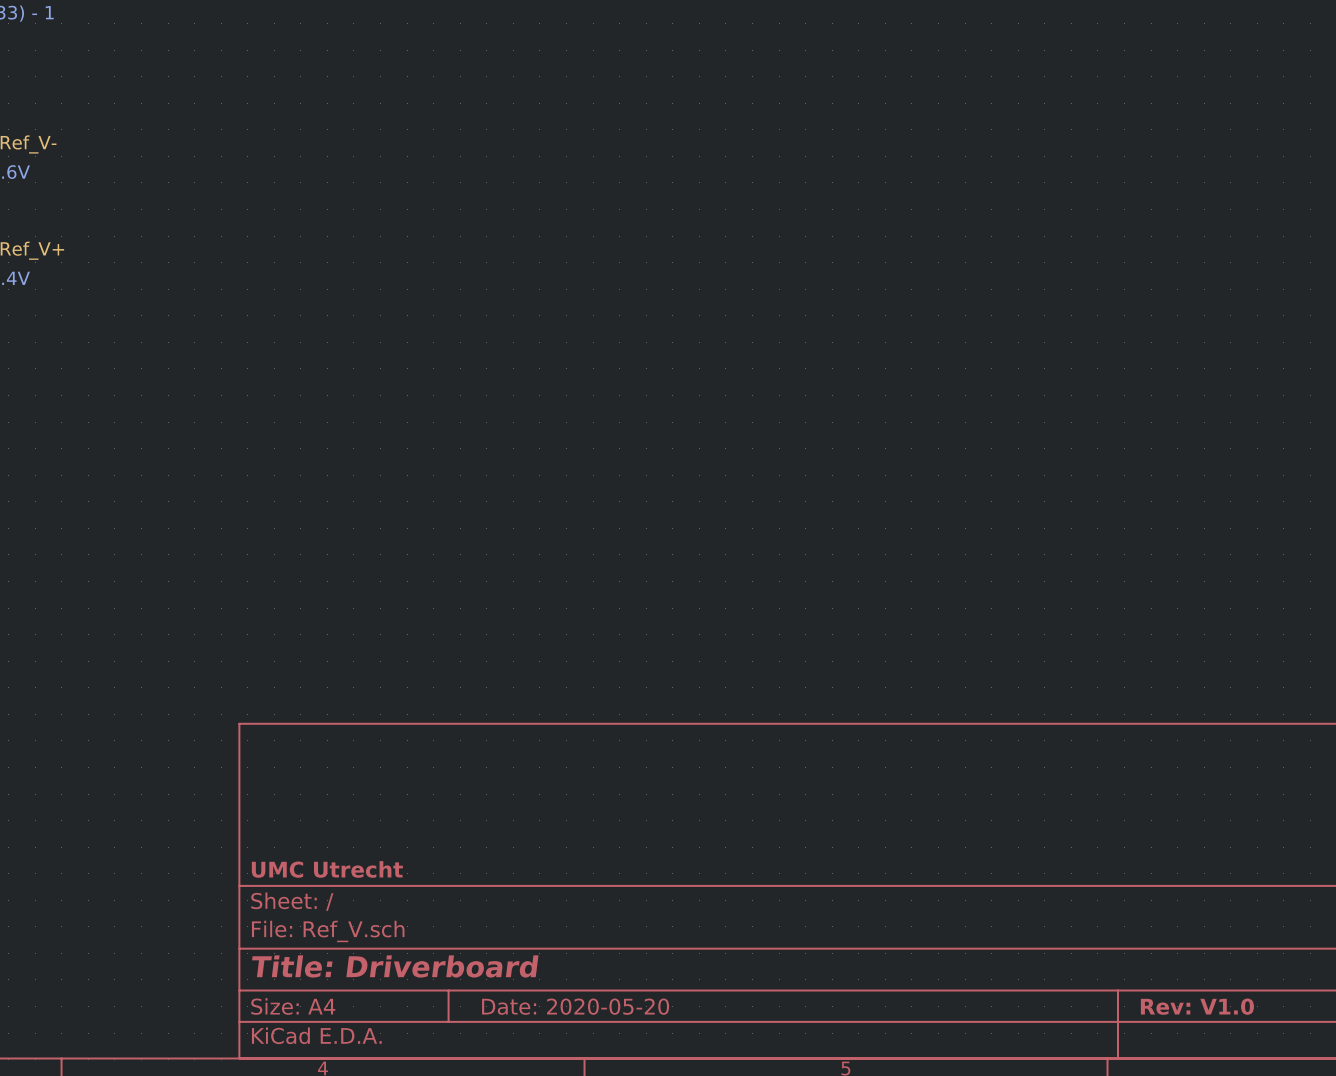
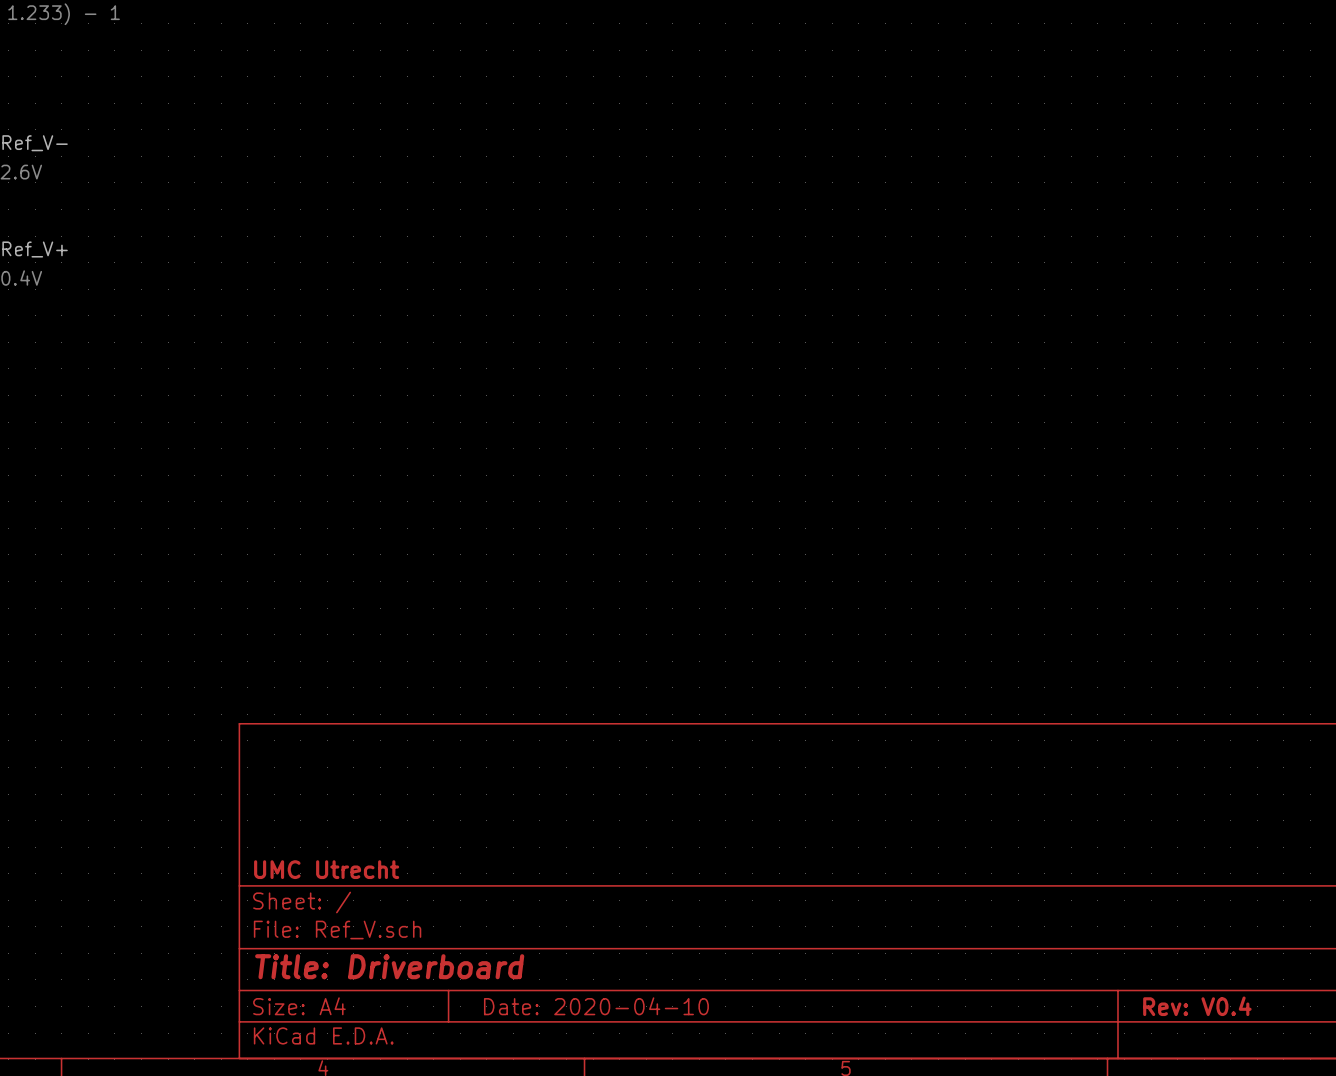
title block: Date: 2020-05-20 (575, 1006) -> Date: 2020-04-10 (596, 1006)
title block: Rev: V1.0 (1197, 1006) -> Rev: V0.4 (1197, 1006)

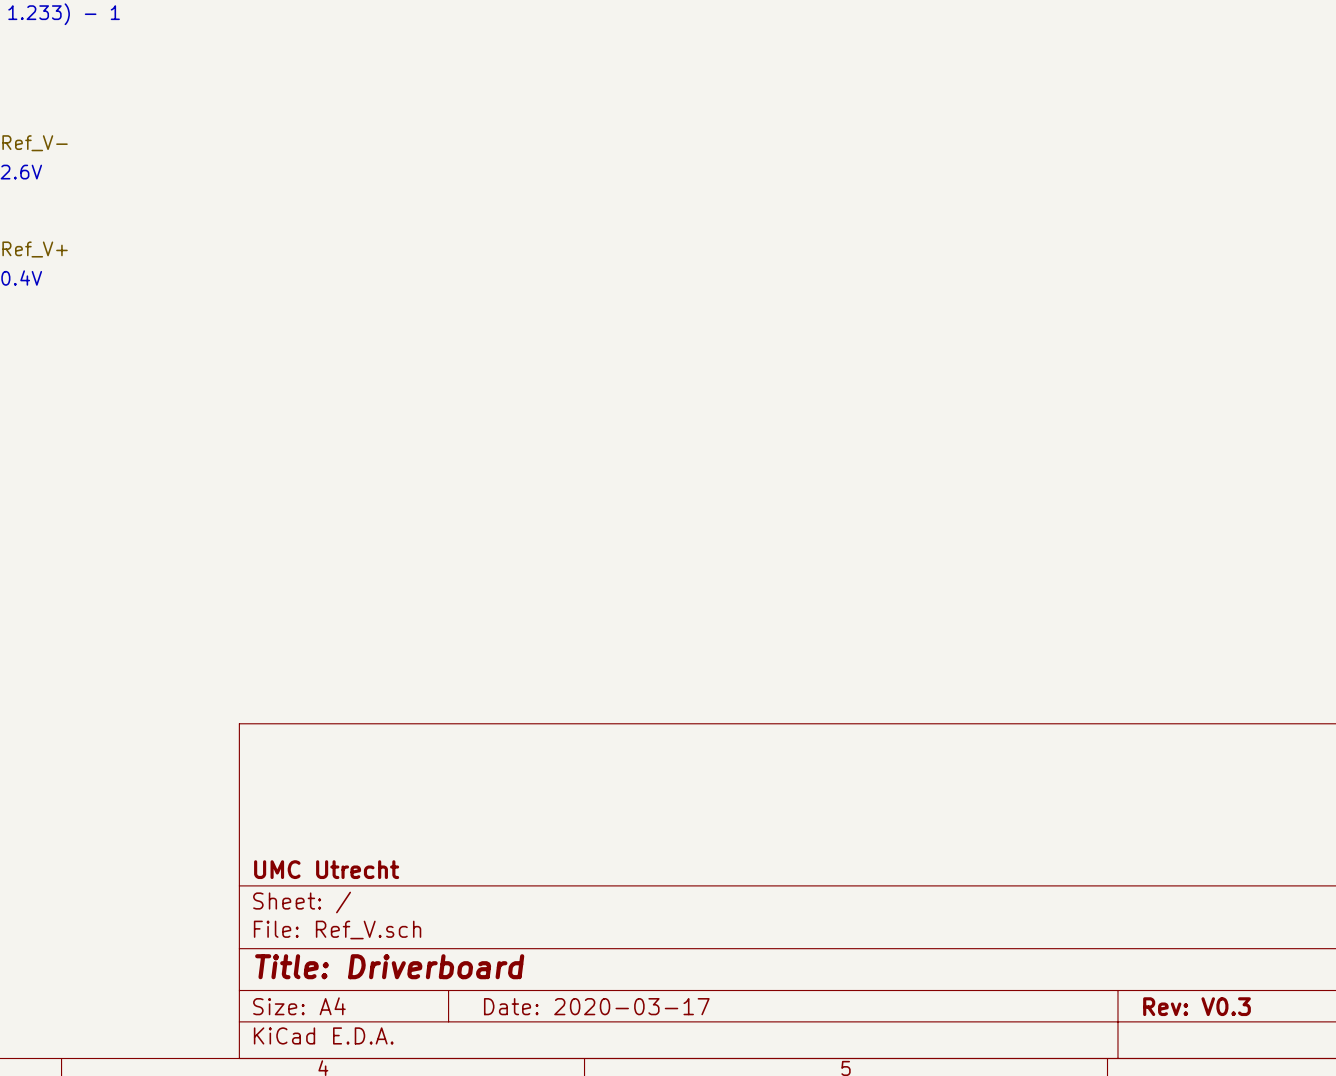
title block: Date: 2020-04-10 (596, 1006) -> Date: 2020-03-17 (596, 1006)
title block: Rev: V0.4 (1197, 1006) -> Rev: V0.3 (1197, 1006)

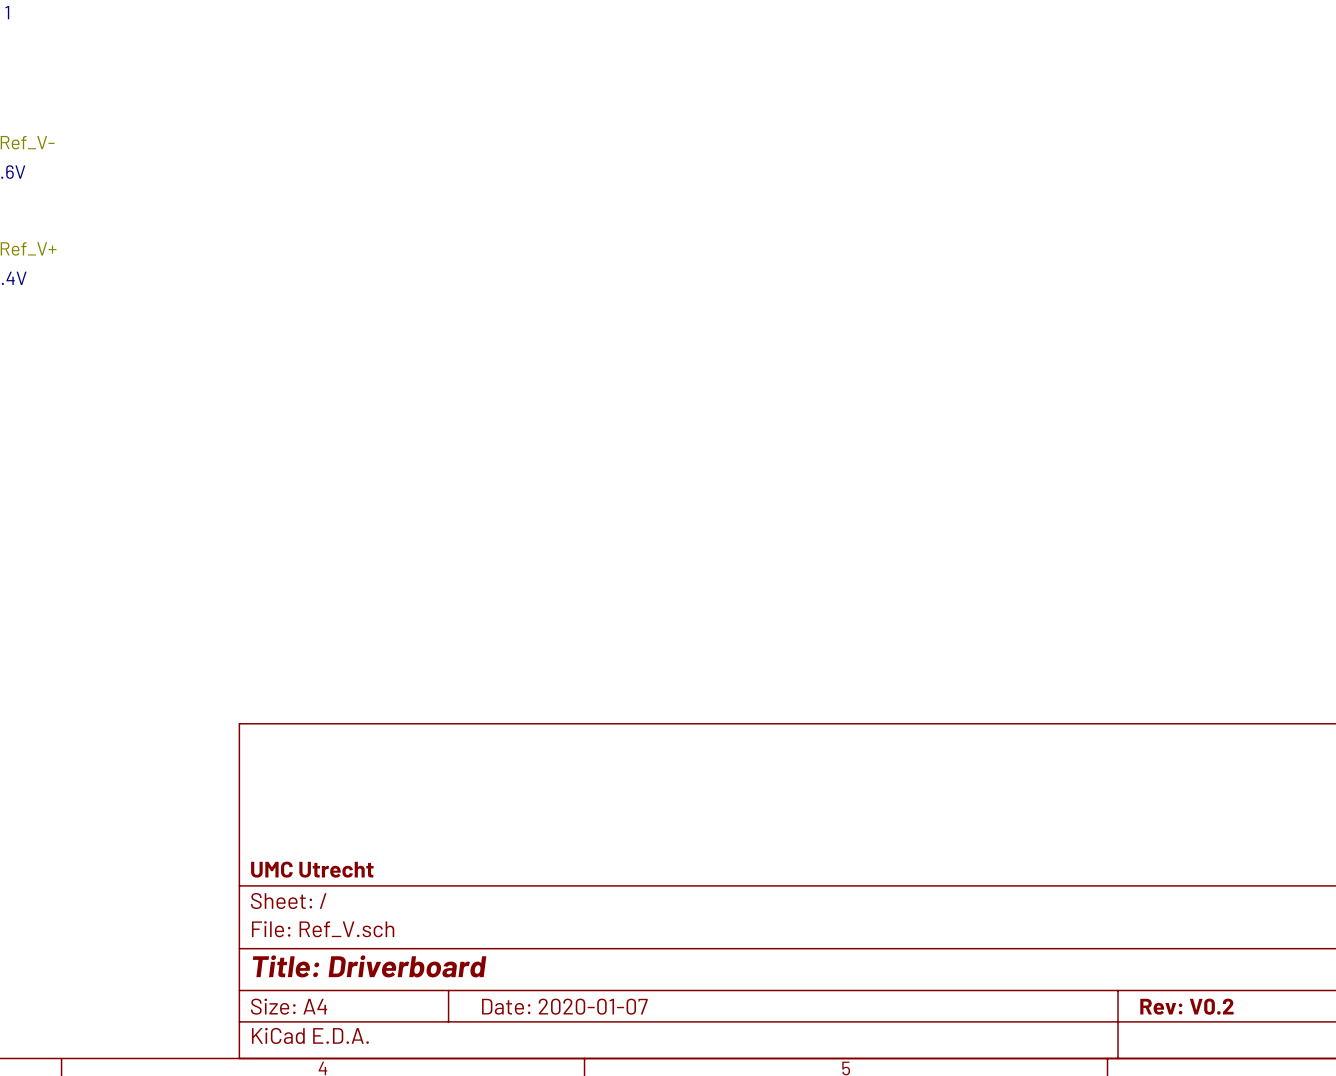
title block: Date: 2020-03-17 (596, 1006) -> Date: 2020-01-07 (564, 1006)
title block: Rev: V0.3 (1197, 1006) -> Rev: V0.2 (1186, 1006)

